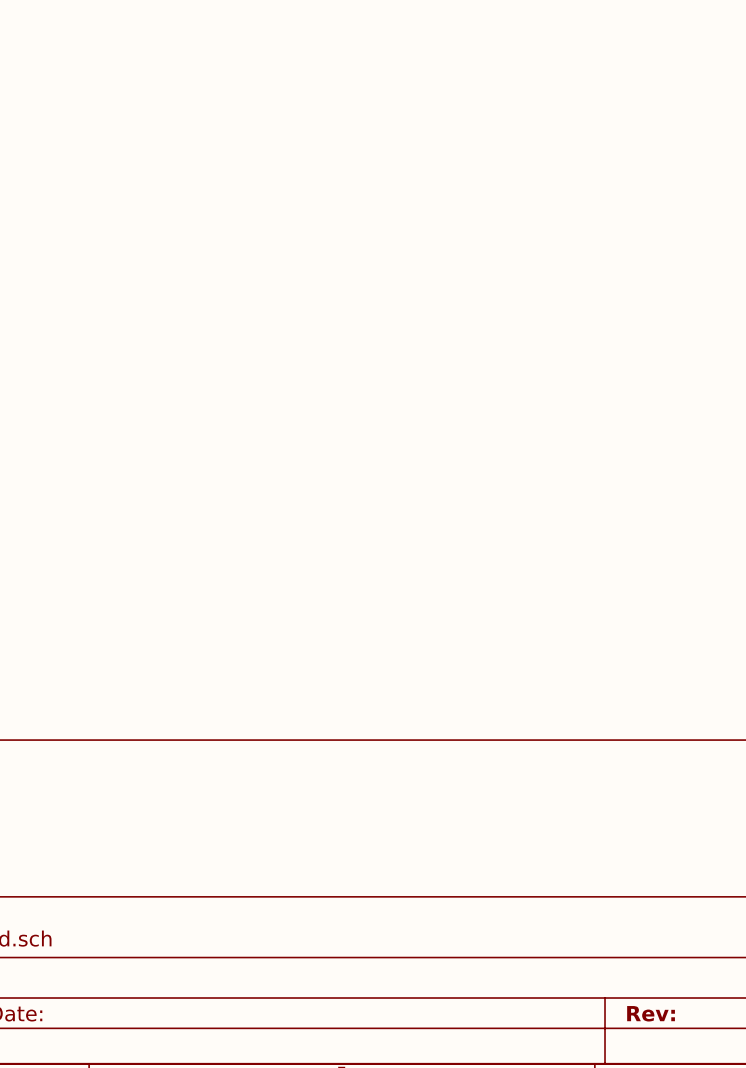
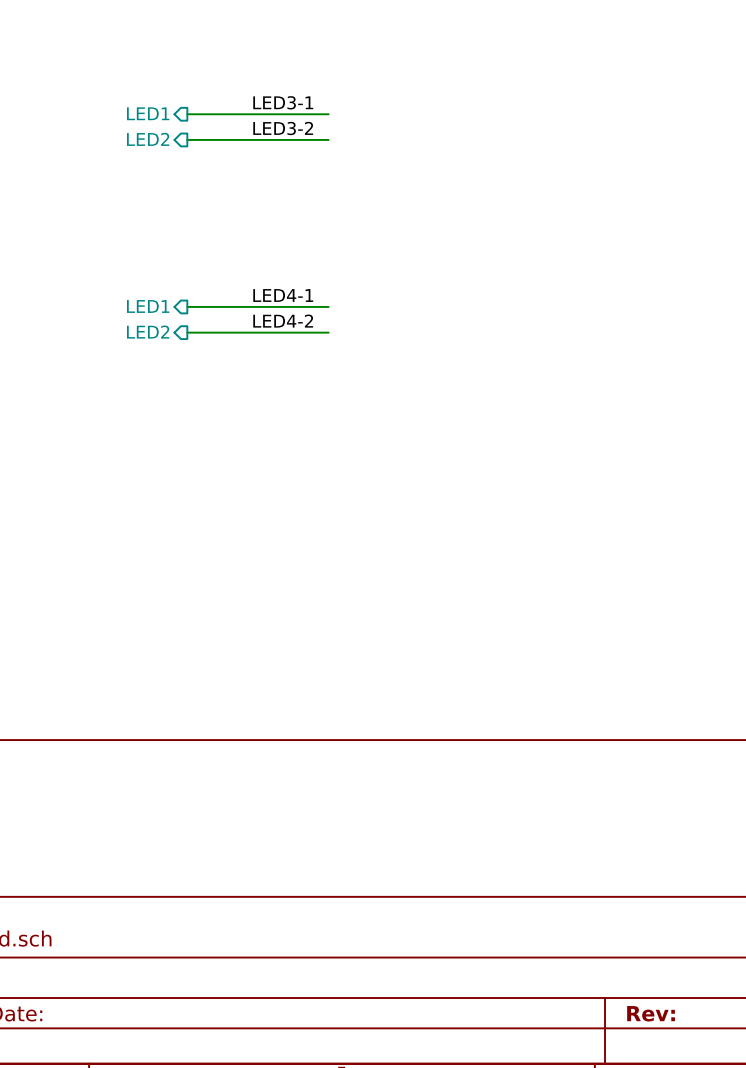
label: none -> LED3-1 (283, 102)
sheet pin: none -> LED1 (148, 113)
wire: none -> (187, 114) (328, 114)
label: none -> LED3-2 (283, 128)
sheet pin: none -> LED2 (148, 139)
wire: none -> (187, 139) (328, 139)
label: none -> LED4-1 (283, 295)
sheet pin: none -> LED1 (148, 306)
wire: none -> (187, 306) (328, 306)
label: none -> LED4-2 (283, 321)
sheet pin: none -> LED2 (148, 332)
wire: none -> (187, 332) (328, 332)

